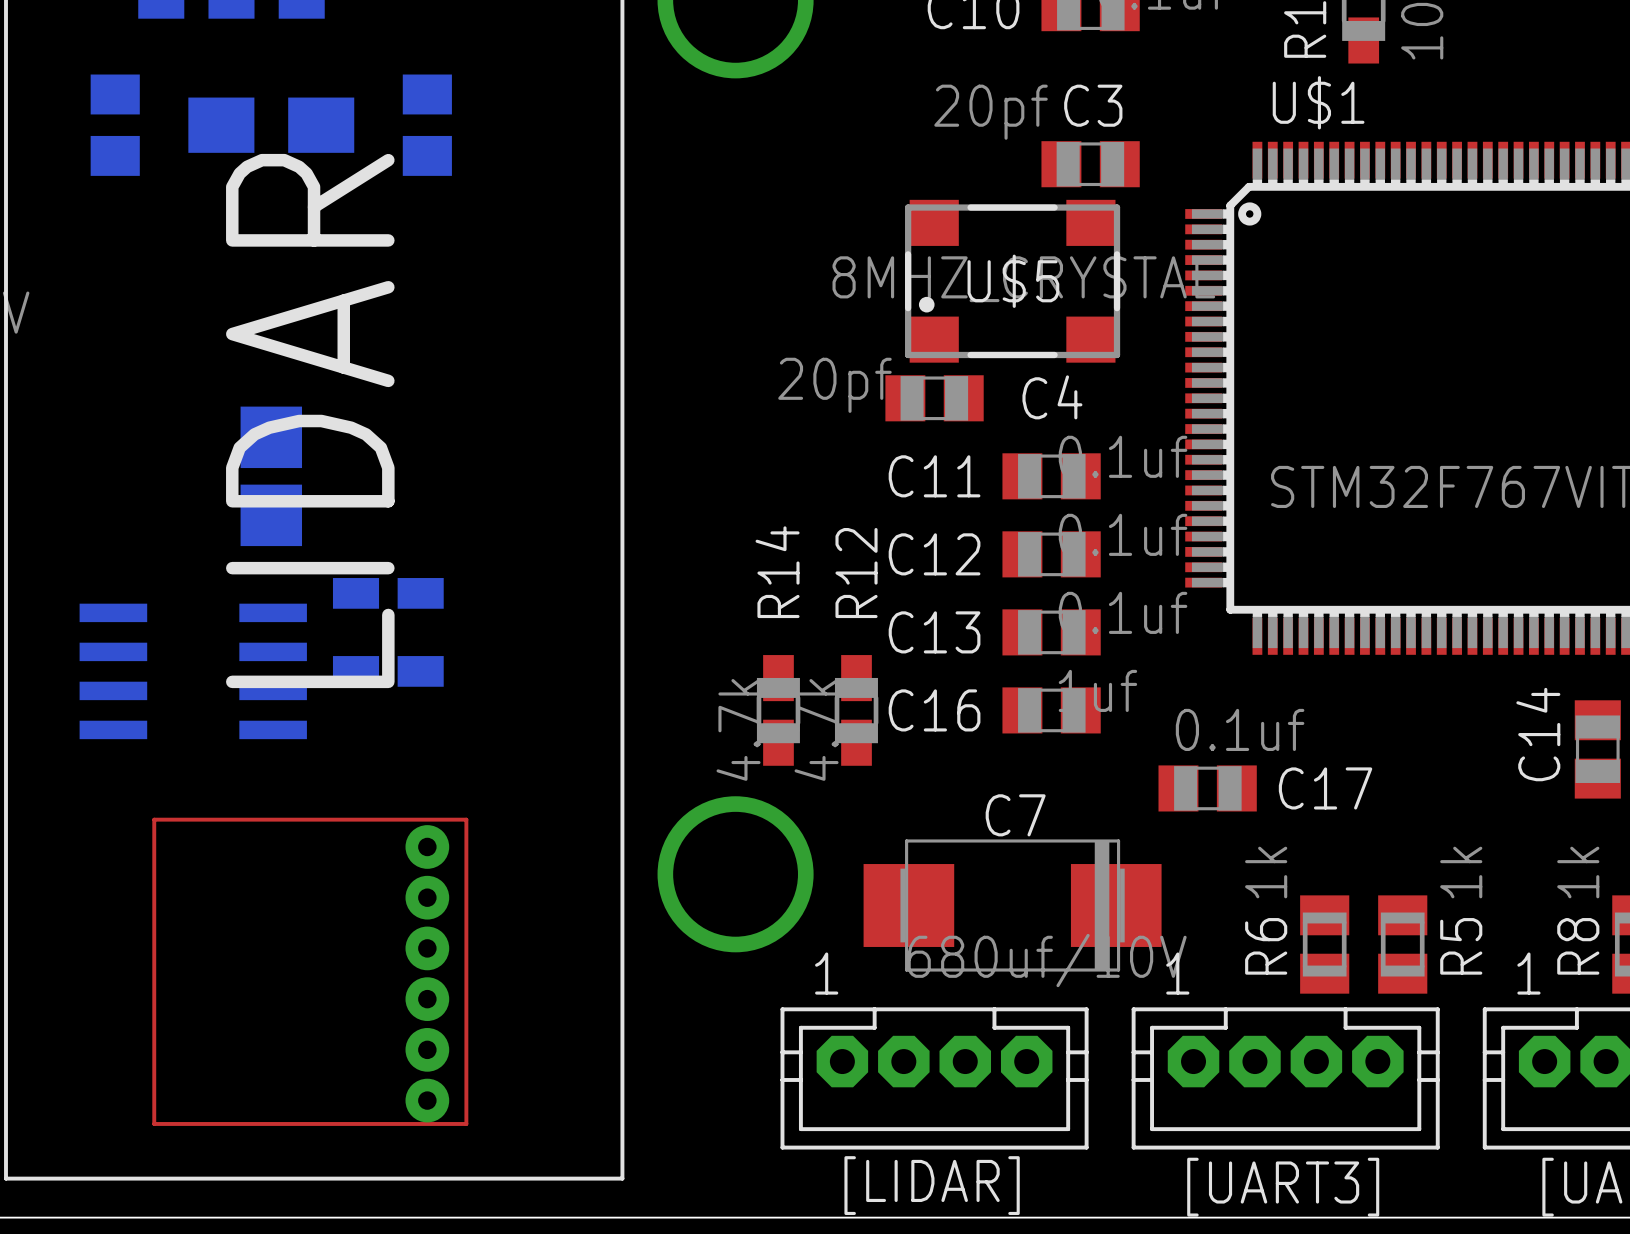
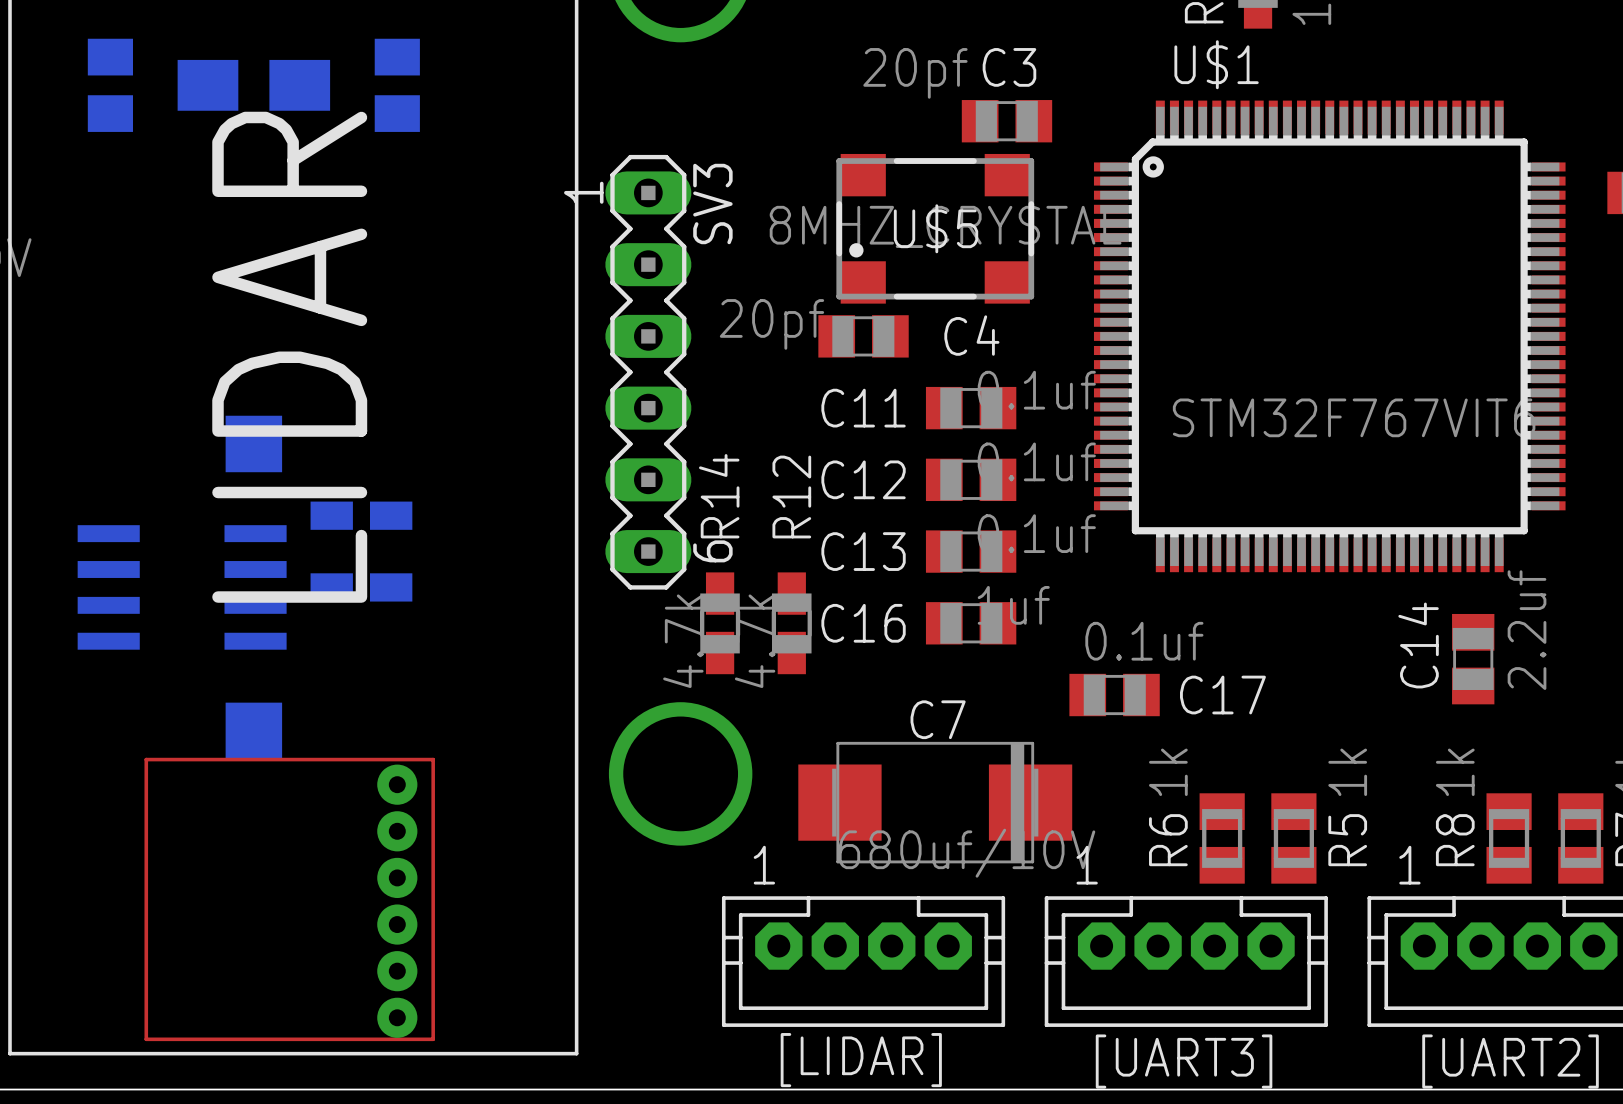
part position: (271, 437) -> (253, 730)
SV3: none -> (648, 372)
part position: (310, 971) -> (289, 899)

